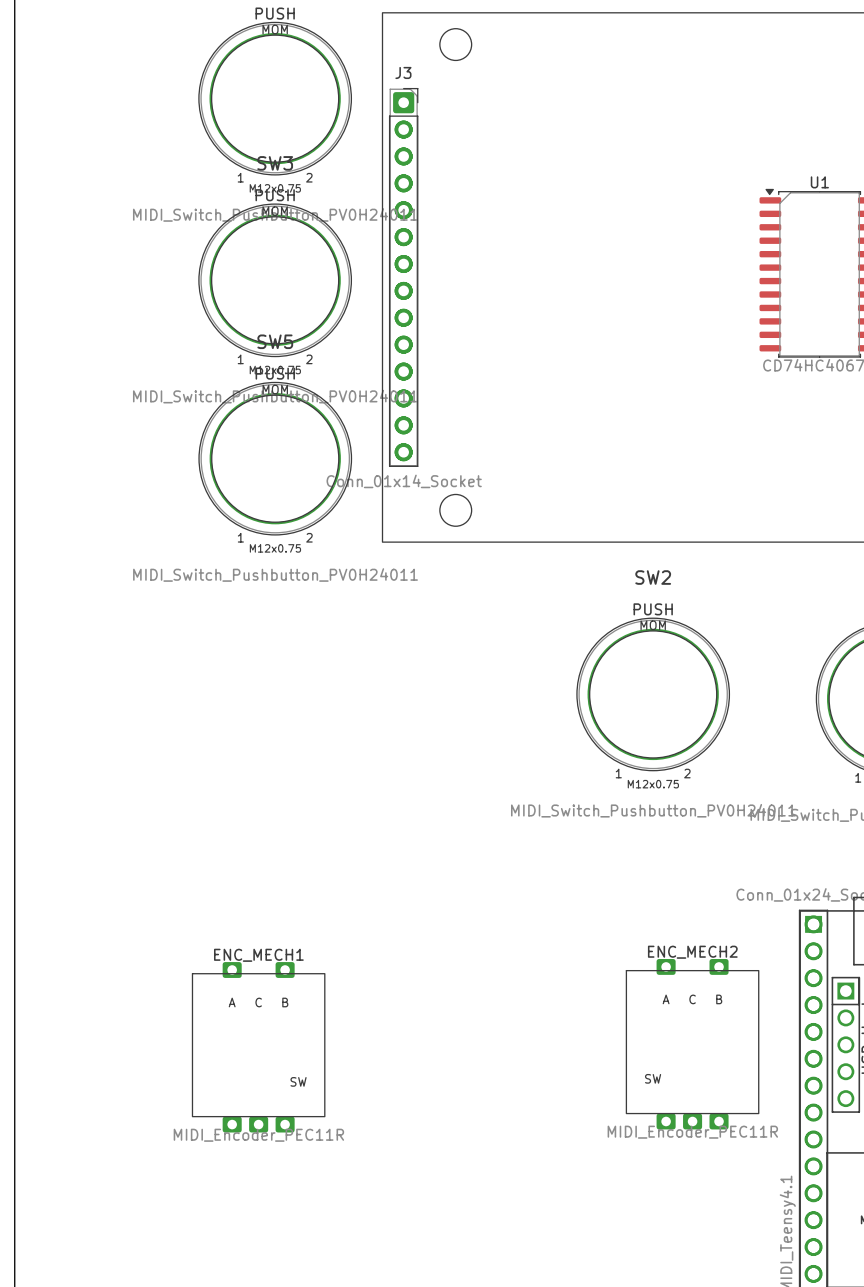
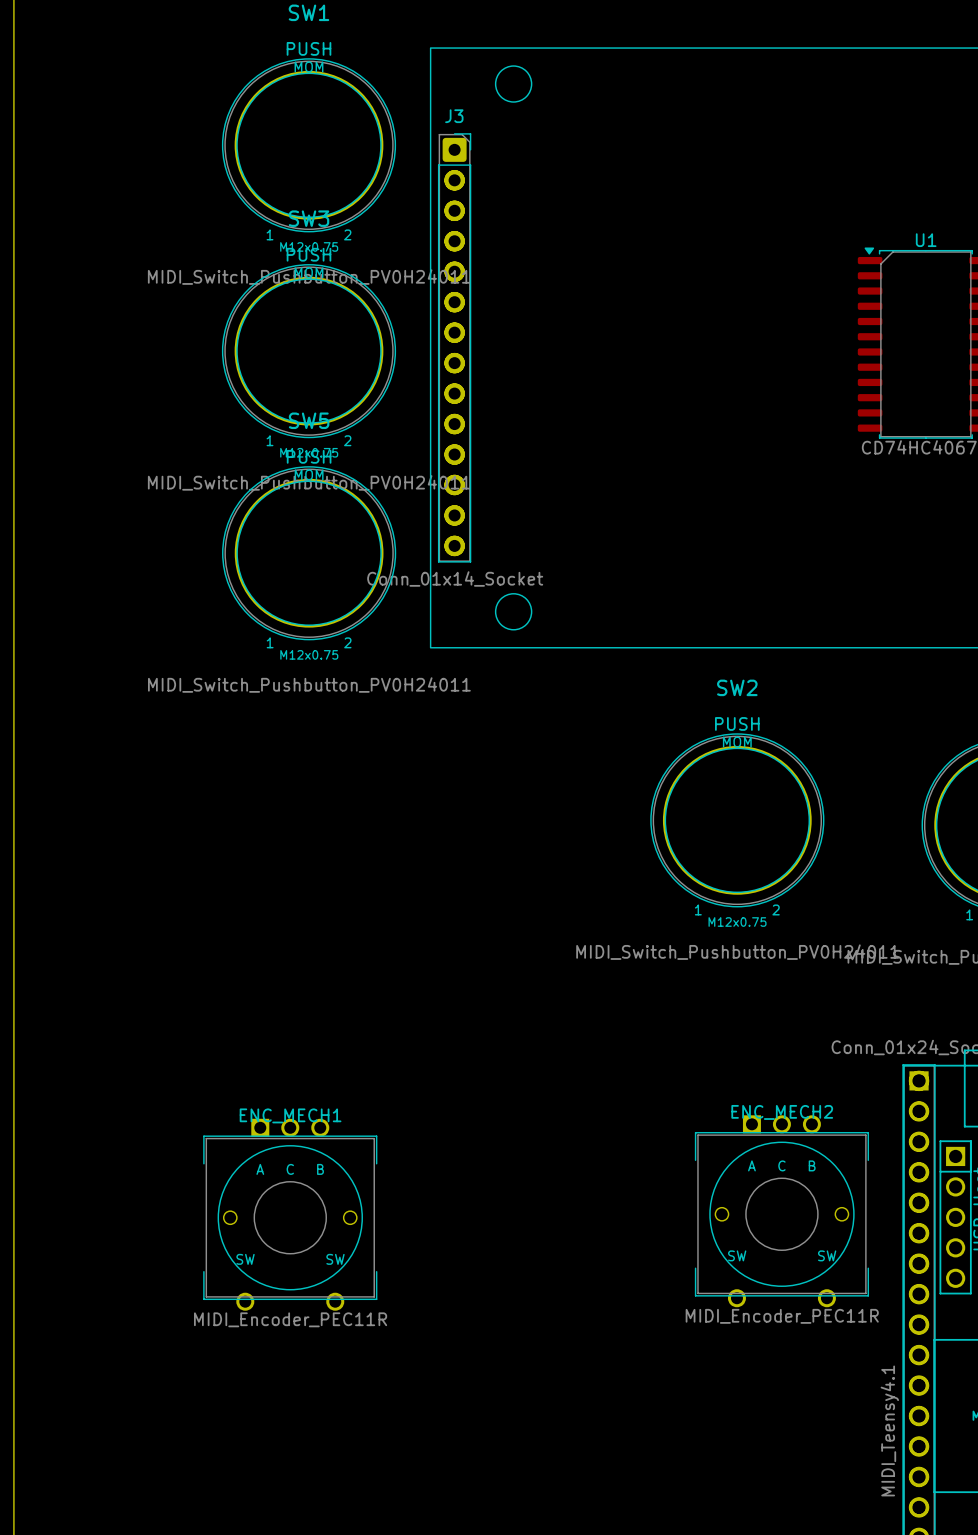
ENC_MECH2 footprint: [625, 958, 760, 1130] -> [694, 1115, 870, 1308]
ENC_MECH1 footprint: [191, 962, 326, 1133] -> [203, 1118, 378, 1311]

